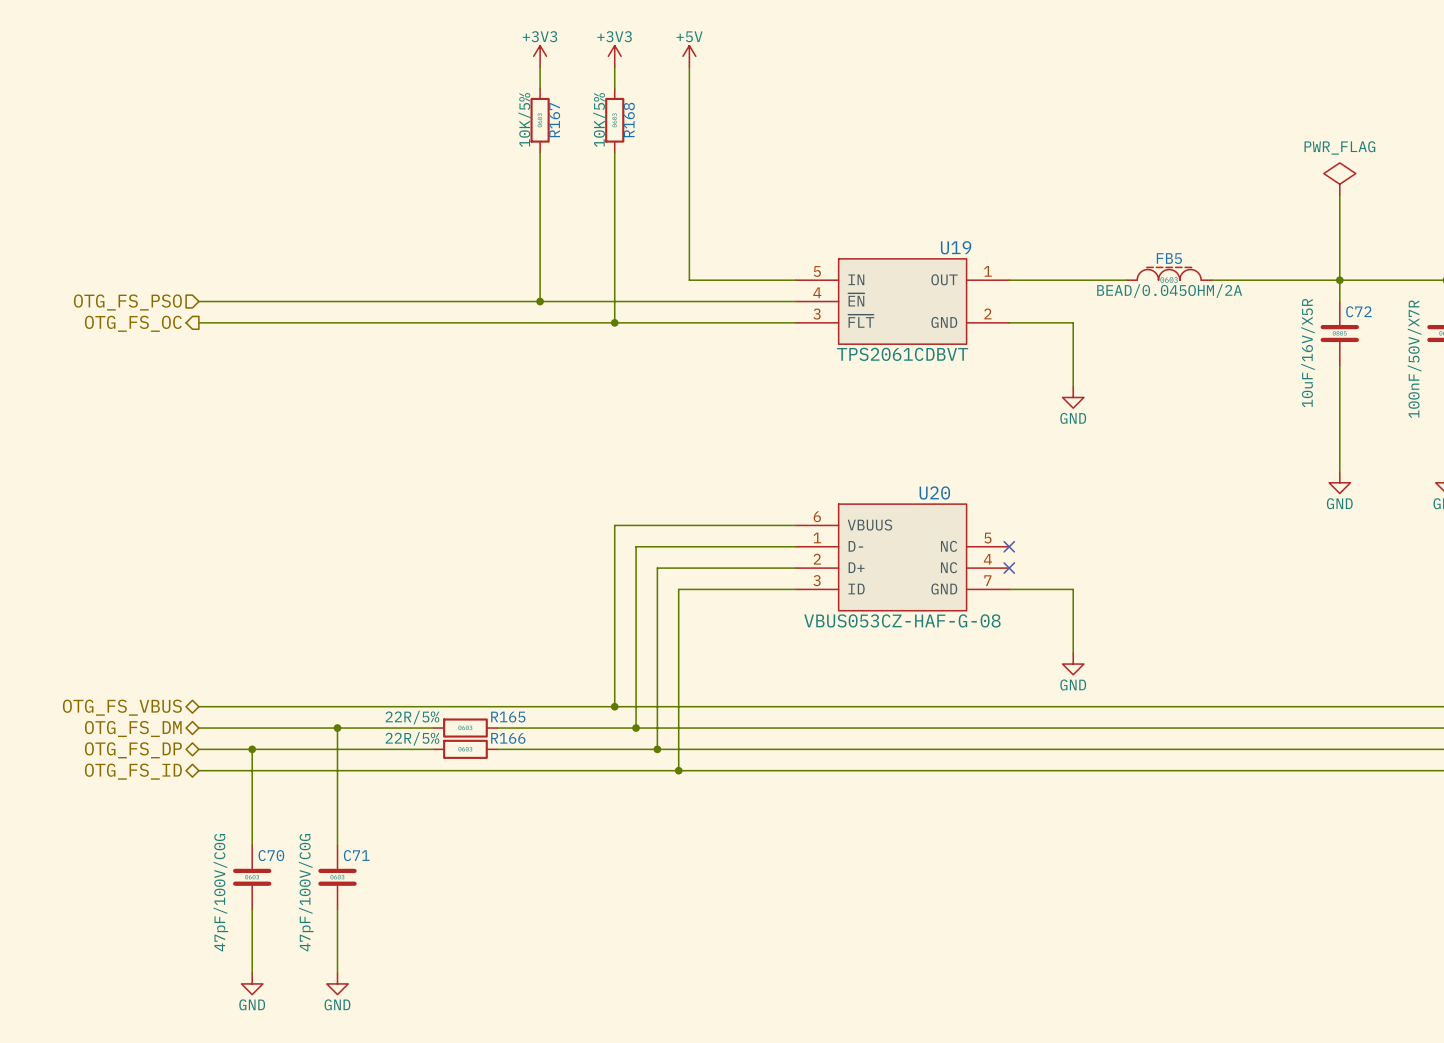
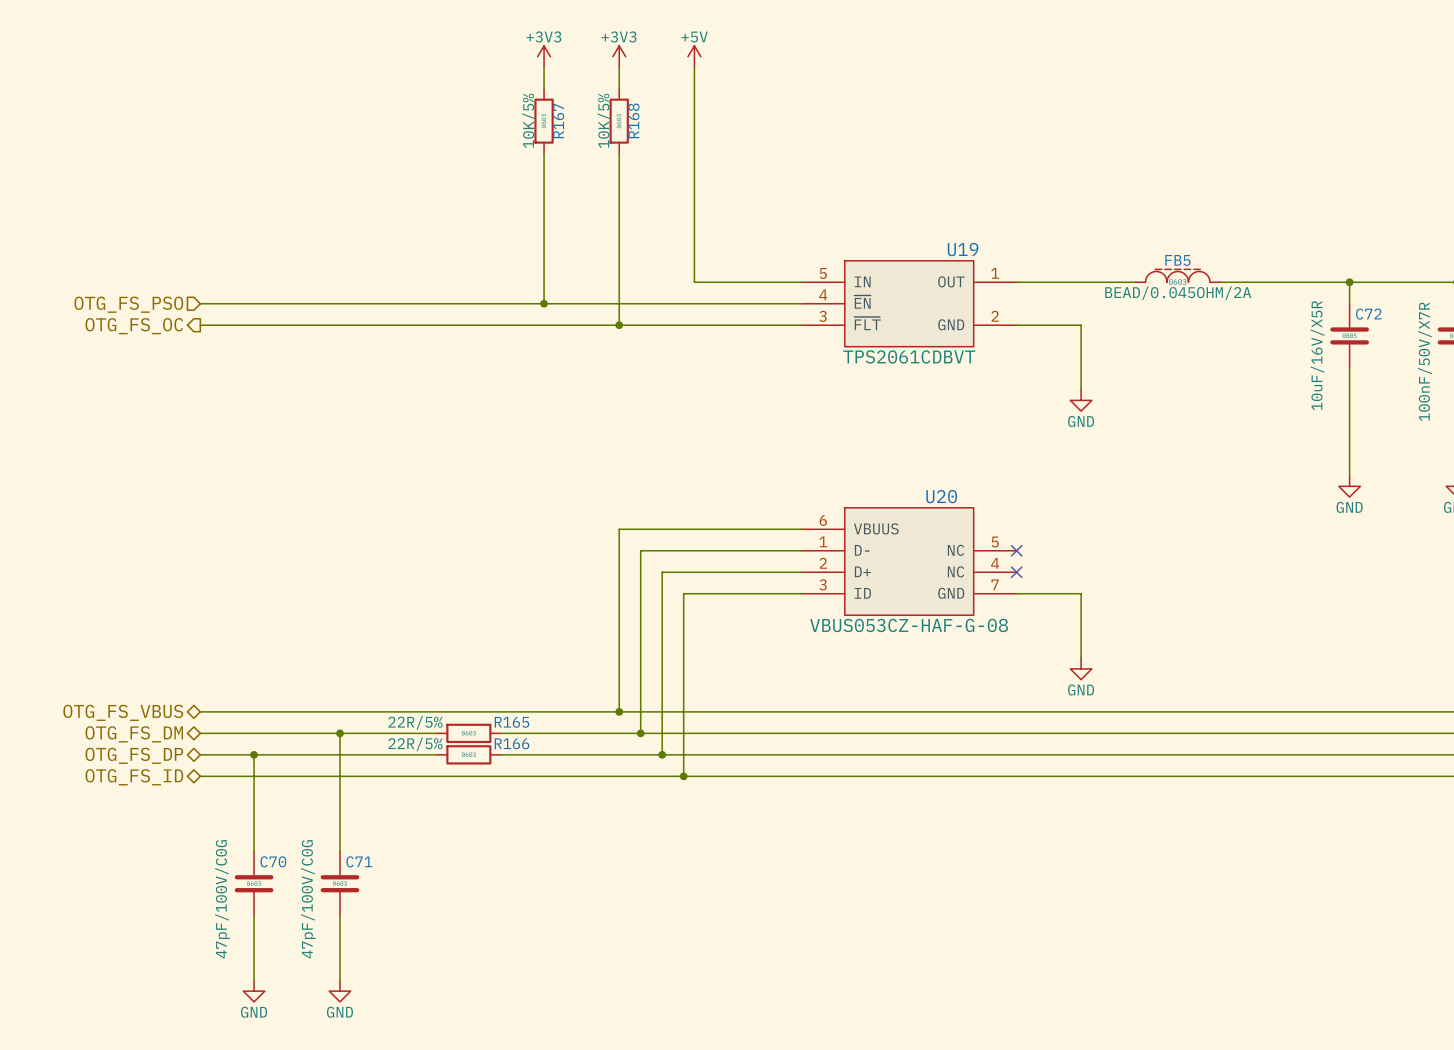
power symbol: PWR_FLAG (1339, 178) -> none
wire: (1339, 194) (1339, 280) -> none

